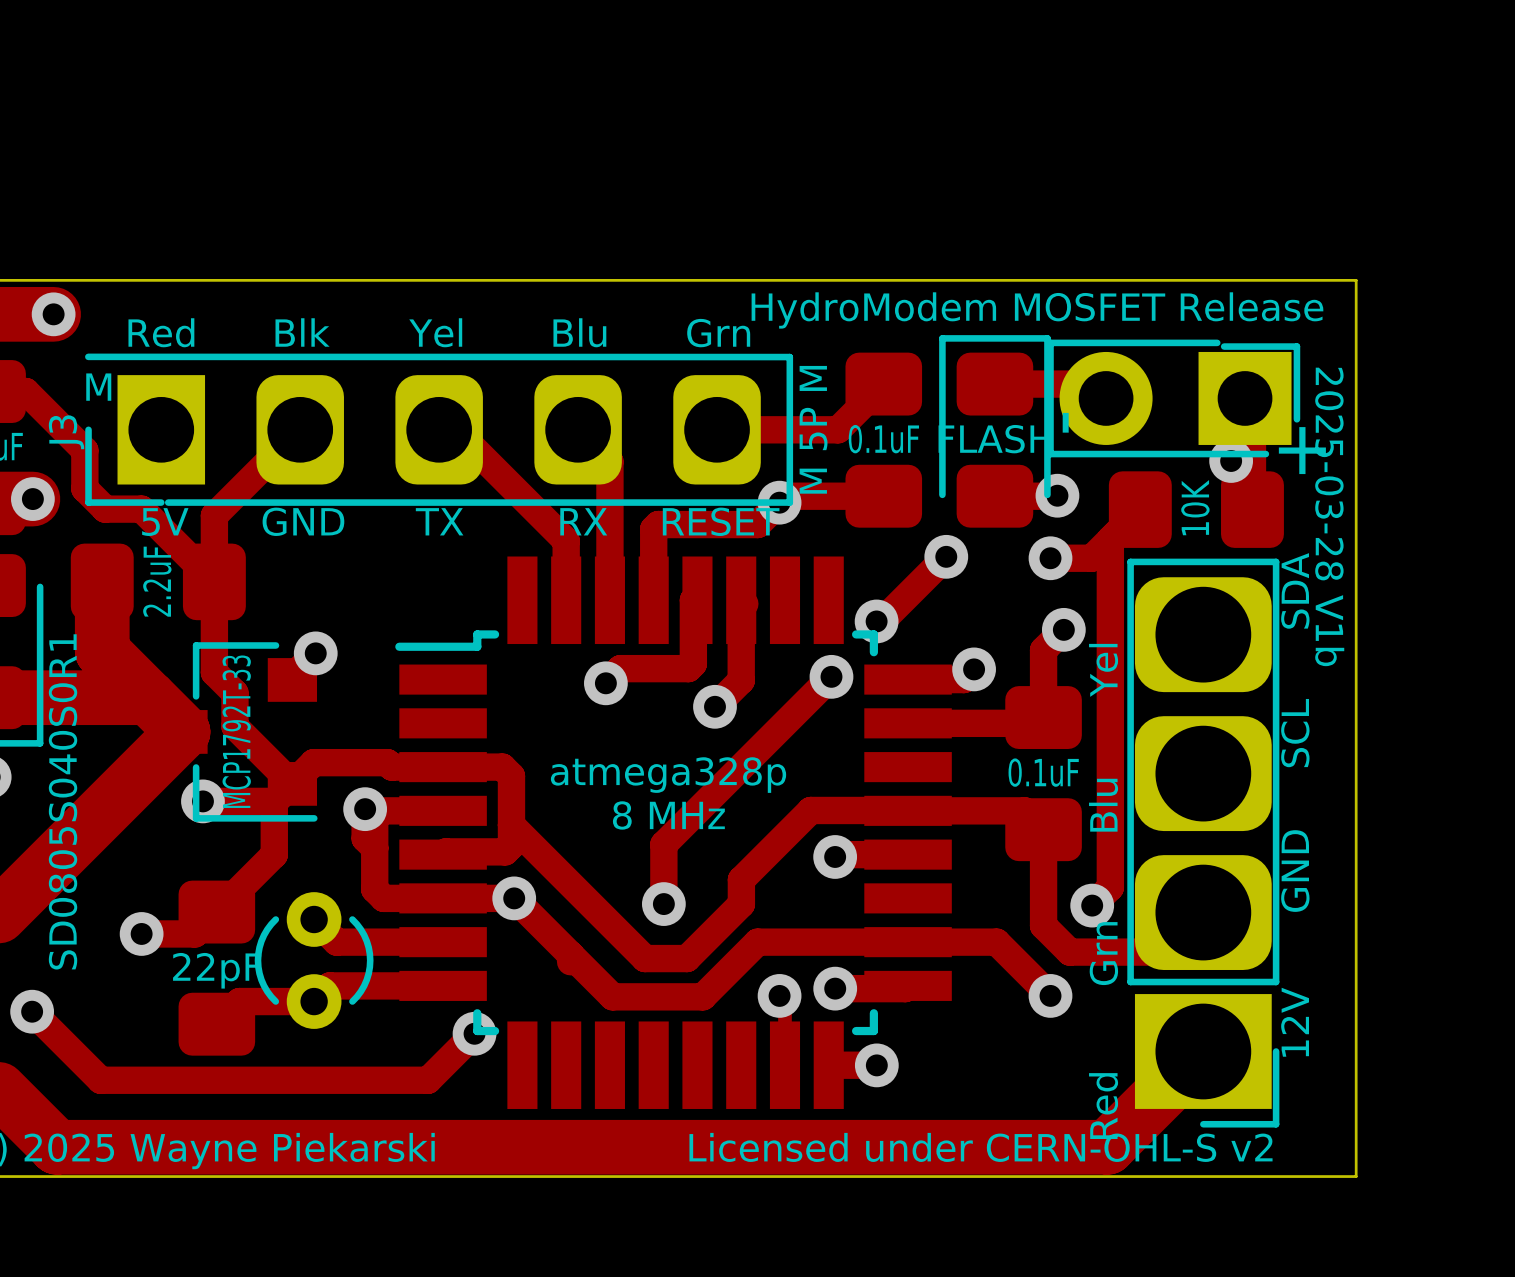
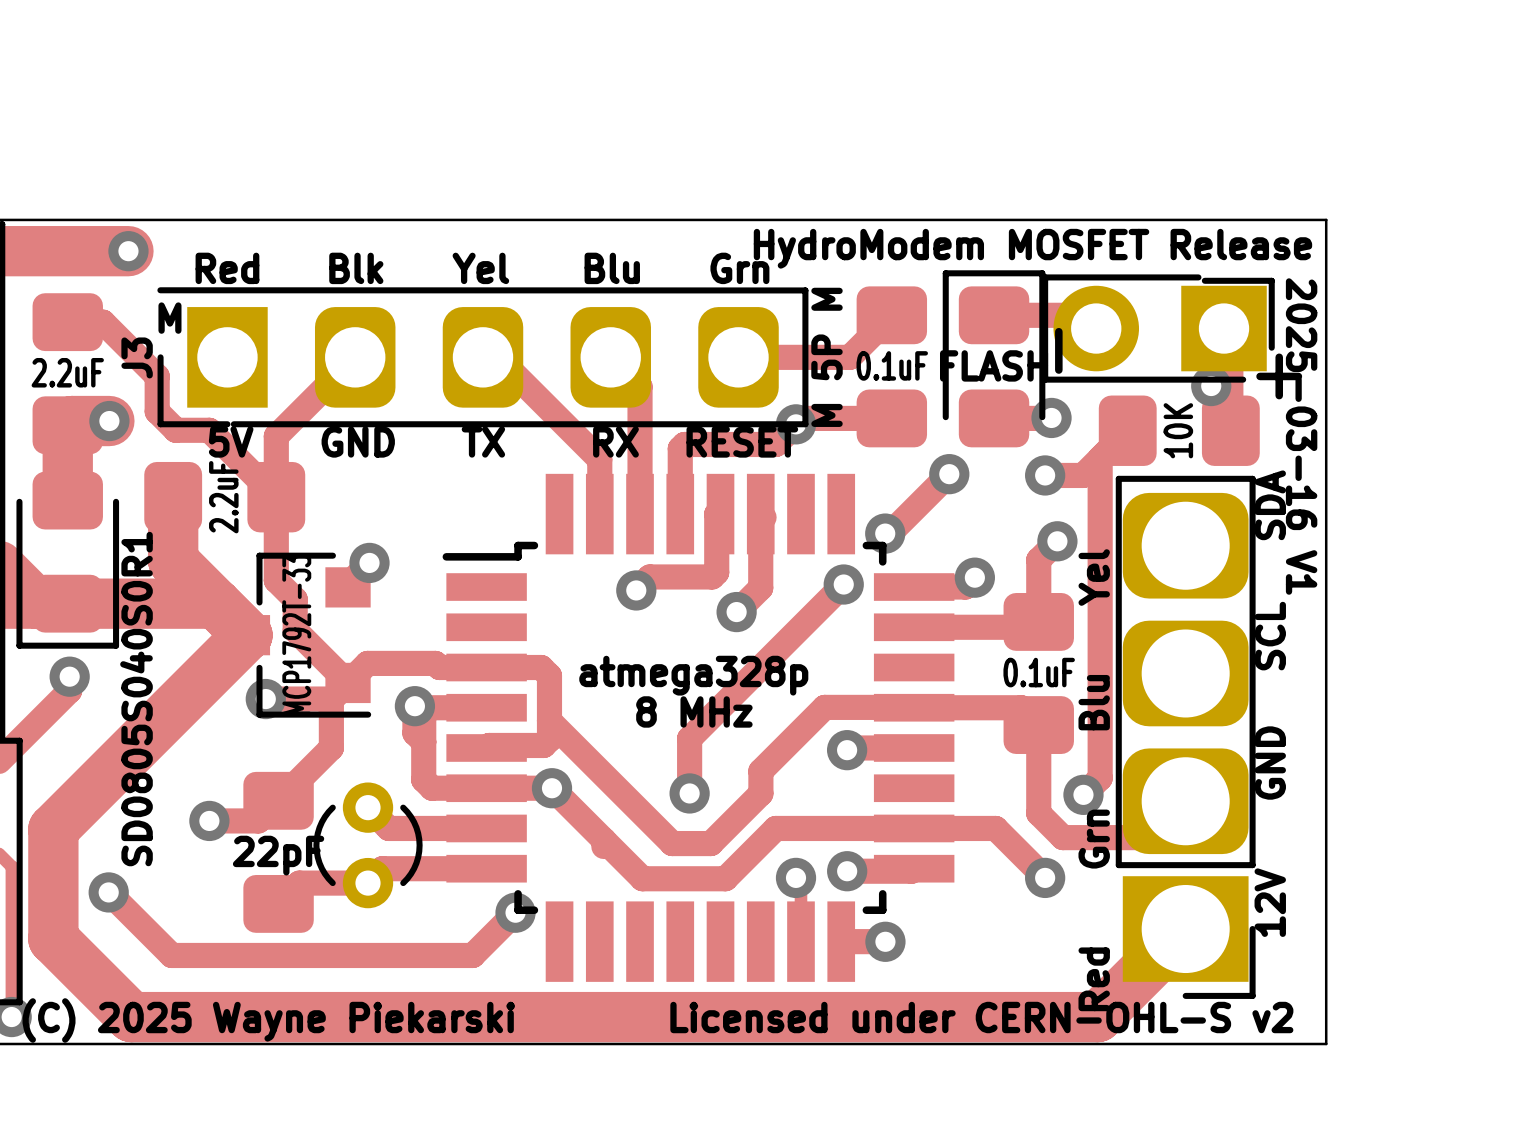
text: 2025-03-28 V1b (1329, 516) -> 2025-03-16 V1 (1301, 436)

